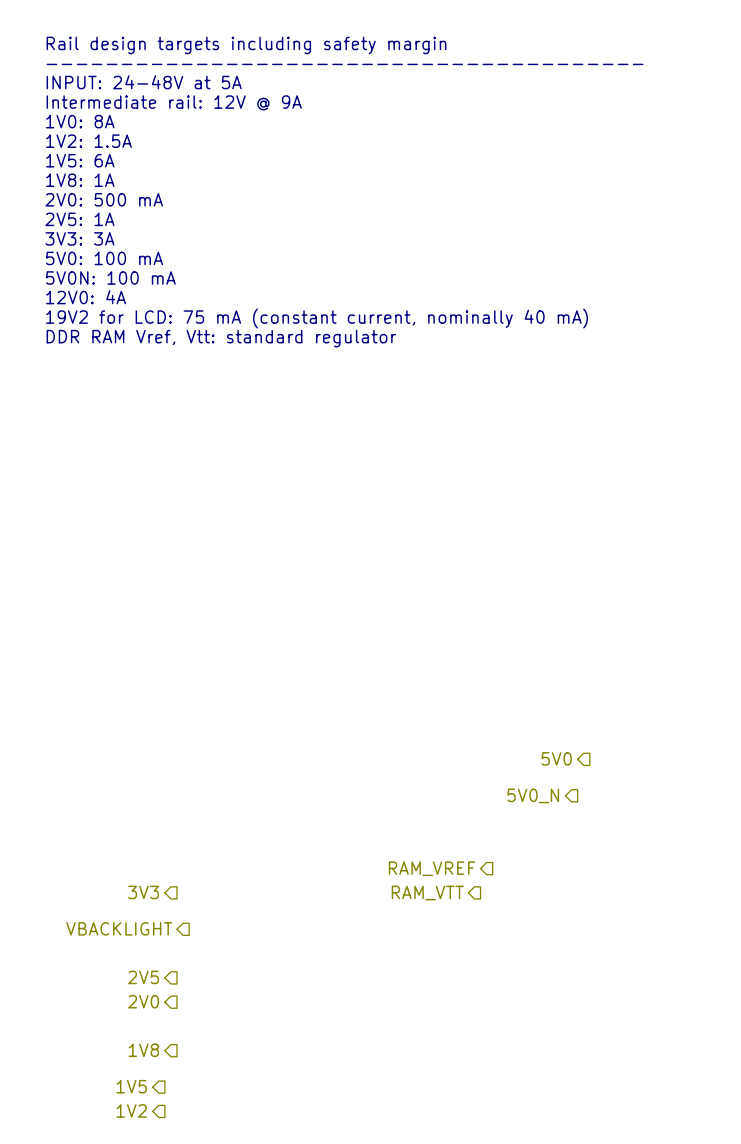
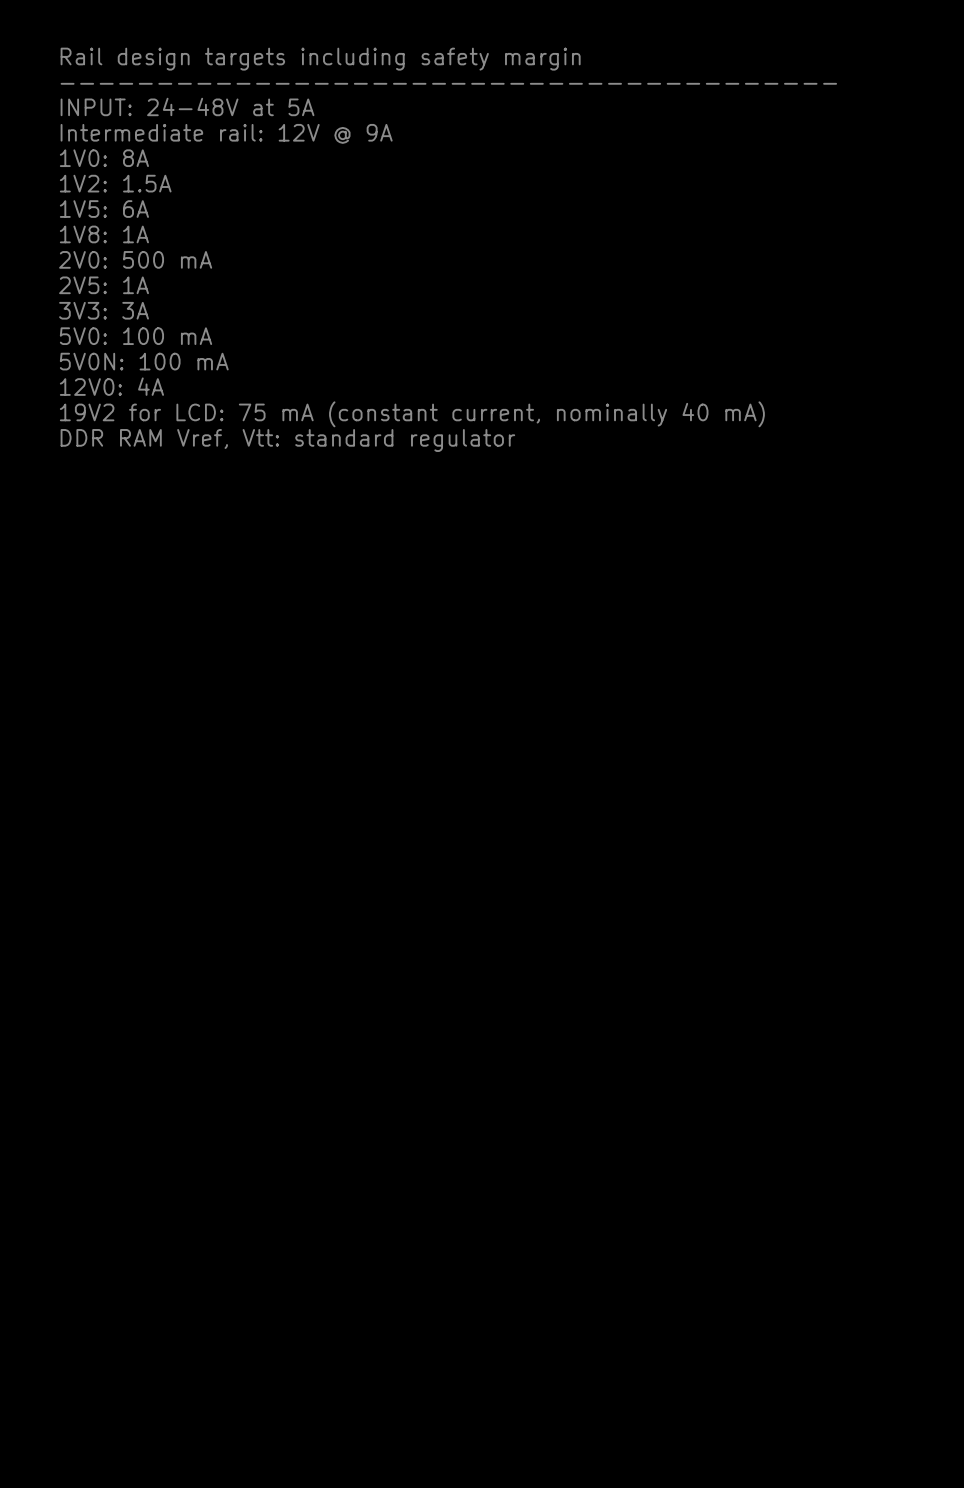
hierarchical label: 5V0 (556, 758) -> none
hierarchical label: 5V0_N (533, 795) -> none
hierarchical label: RAM_VREF (432, 868) -> none
hierarchical label: 3V3 (143, 892) -> none
hierarchical label: RAM_VTT (427, 893) -> none
hierarchical label: VBACKLIGHT (119, 928) -> none
hierarchical label: 2V5 (143, 977) -> none
hierarchical label: 2V0 (143, 1001) -> none
hierarchical label: 1V8 (143, 1050) -> none
hierarchical label: 1V5 (131, 1086) -> none
hierarchical label: 1V2 (131, 1110) -> none

